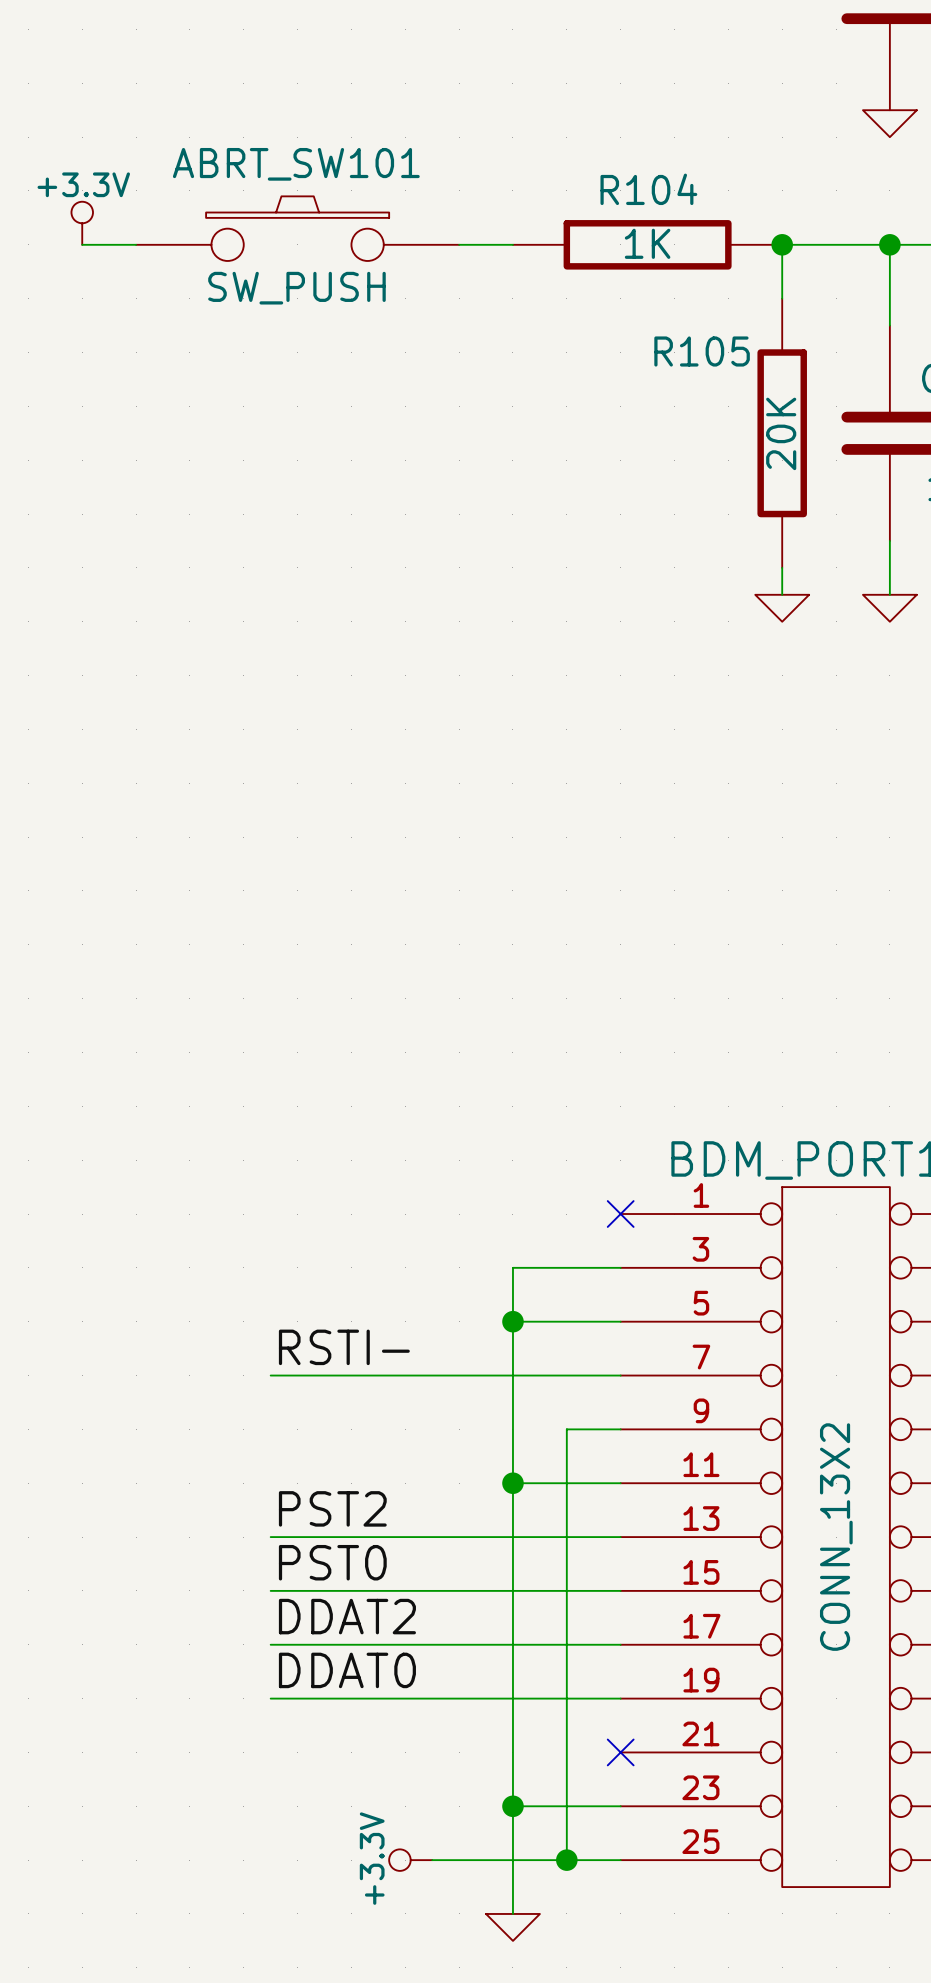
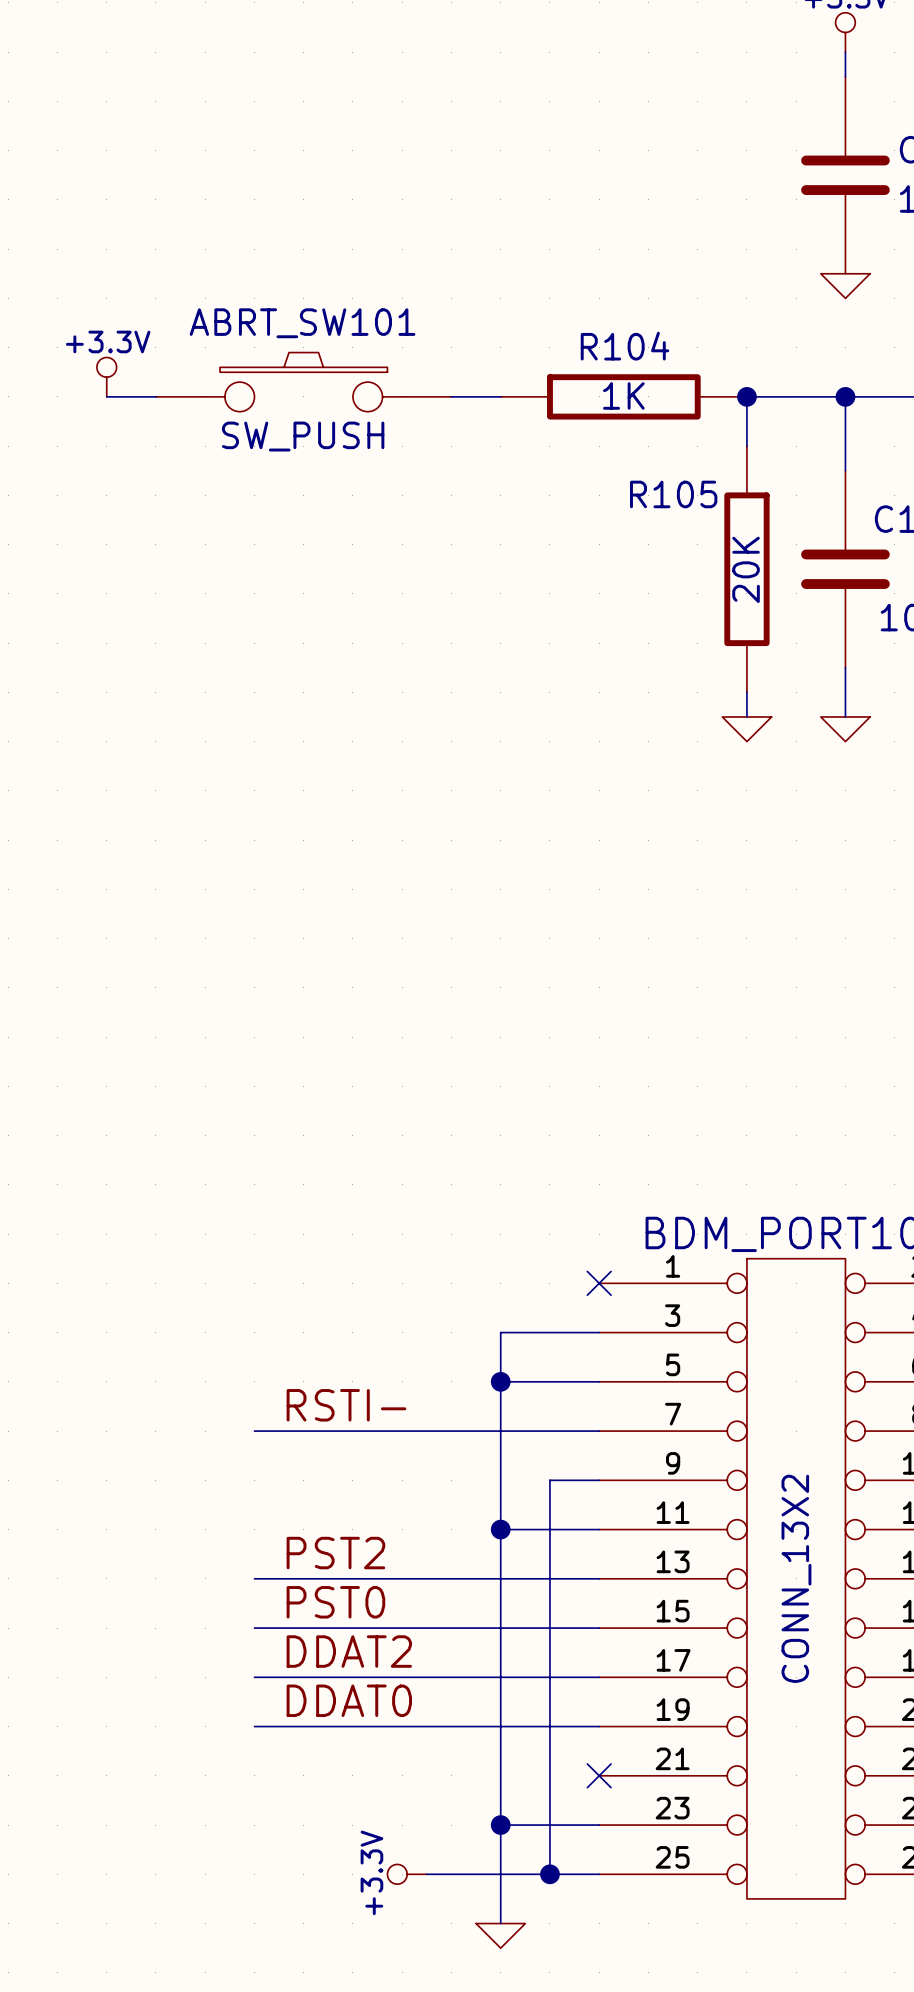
wire: none -> (254, 1431) (279, 1431)
wire: none -> (254, 1578) (279, 1578)
wire: none -> (254, 1628) (279, 1628)
wire: none -> (254, 1677) (279, 1677)
wire: none -> (254, 1726) (279, 1726)

